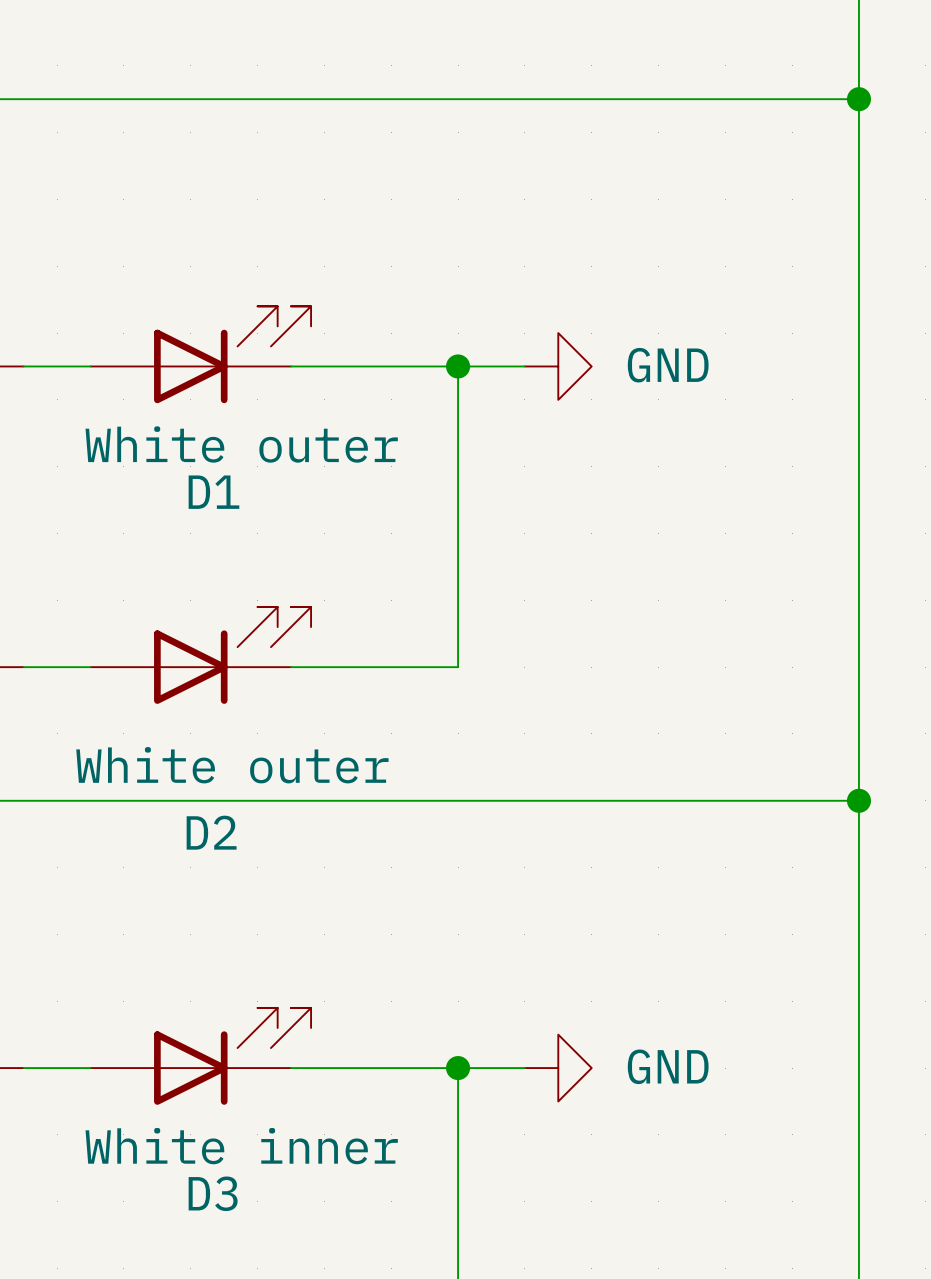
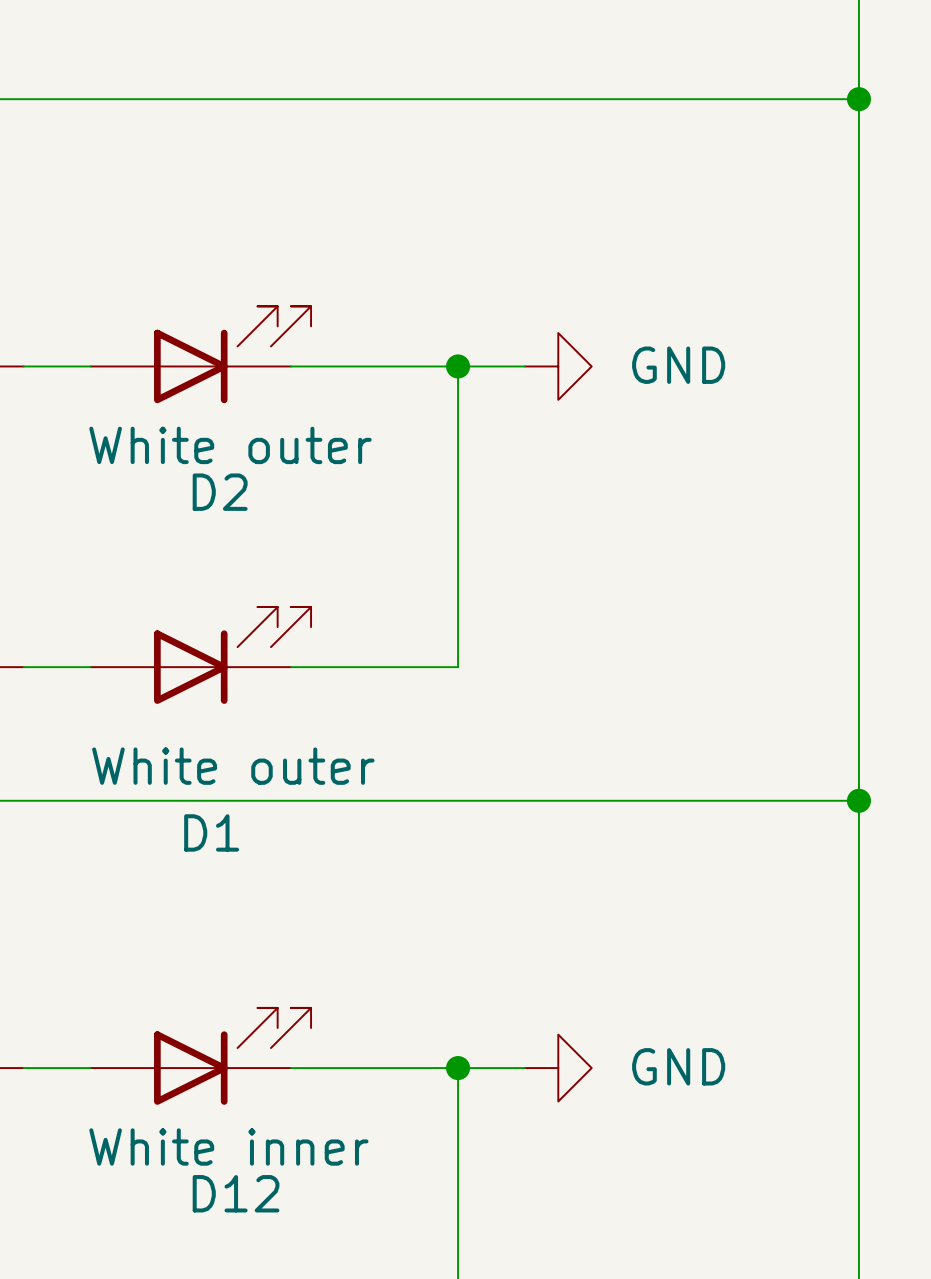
D1 name: D1 (213, 492) -> D2 (220, 492)
D2 name: D2 (211, 832) -> D1 (211, 832)
D3 name: D3 (213, 1193) -> D12 (236, 1193)

